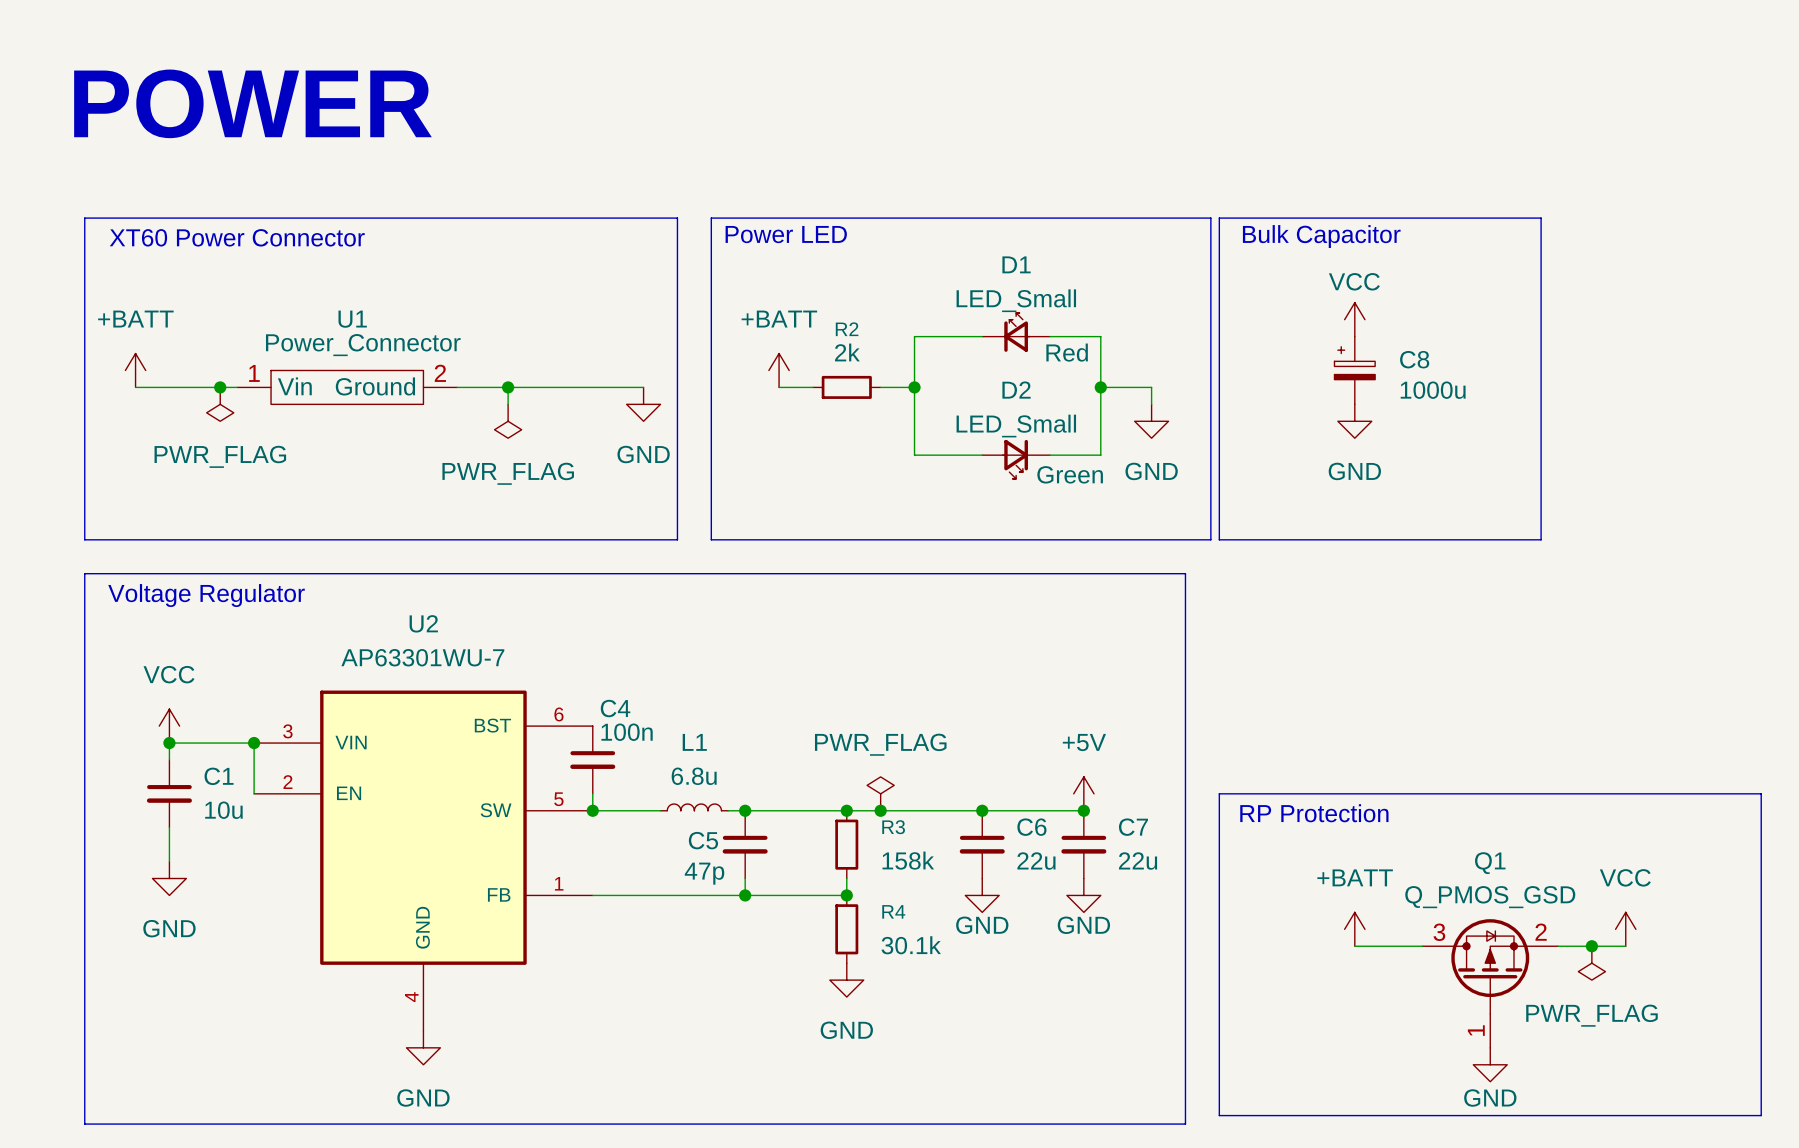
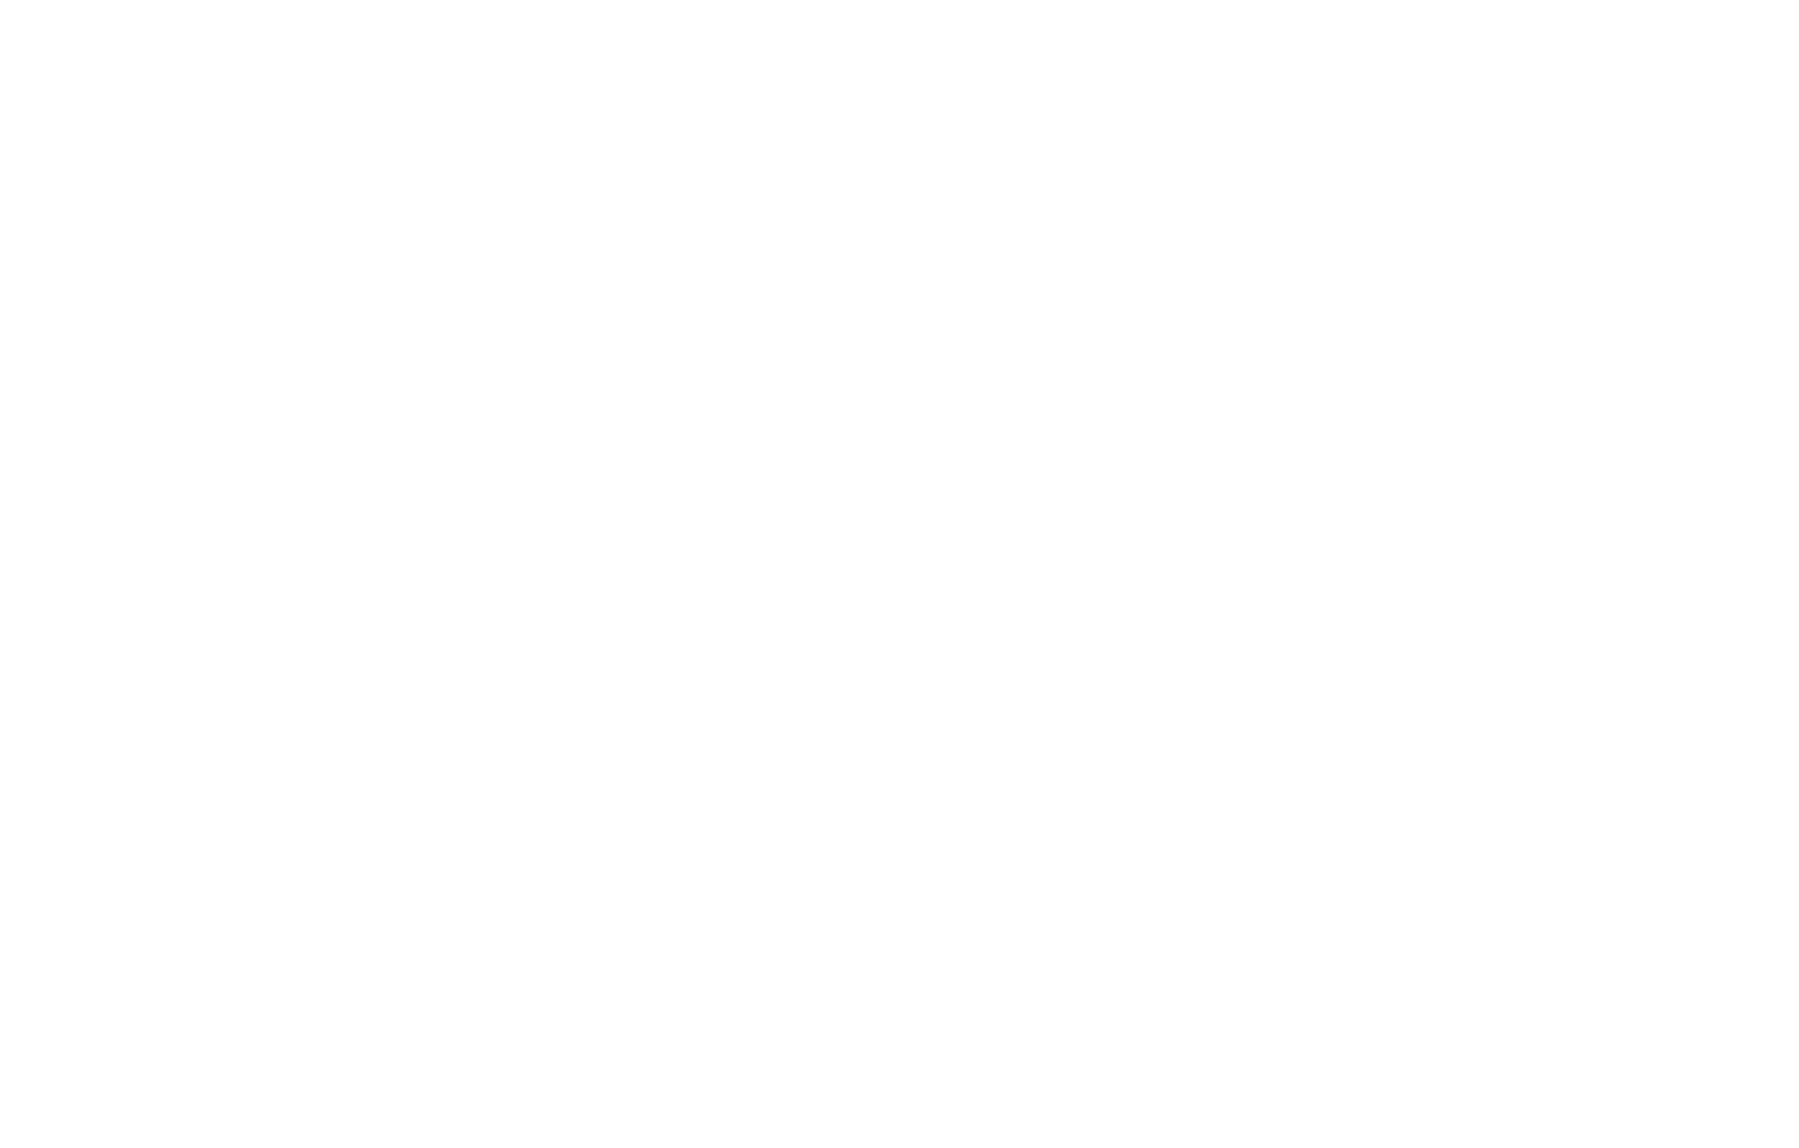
text: POWER (252, 103) -> none
line: (84, 218) (677, 218) (677, 539) (84, 539) (84, 218) -> none
line: (711, 218) (1210, 218) (1210, 539) (711, 539) (711, 218) -> none
line: (1219, 218) (1219, 539) (1541, 539) (1541, 218) (1219, 218) -> none
text: Power LED (786, 234) -> none
text: Bulk Capacitor (1321, 236) -> none
text: XT60 Power Connector (237, 237) -> none
power symbol: VCC (1354, 319) -> none
D1: LED_Small (1016, 332) -> none
wire: (982, 336) (914, 336) (914, 455) (982, 455) -> none
wire: (1049, 336) (1100, 336) (1100, 455) (1049, 455) -> none
power symbol: +BATT (135, 370) -> none
power symbol: +BATT (779, 370) -> none
C8: 1000u (1354, 370) -> none
wire: (135, 387) (237, 387) -> none
junction: (220, 387) -> none
U1: Power_Connector (347, 387) -> none
wire: (457, 387) (643, 387) -> none
wire: (508, 387) (508, 404) -> none
junction: (508, 387) -> none
wire: (779, 387) (812, 387) -> none
R2: 2k (846, 387) -> none
wire: (880, 387) (914, 387) -> none
junction: (914, 387) -> none
wire: (1100, 387) (1151, 387) (1151, 404) -> none
junction: (1100, 387) -> none
power symbol: PWR_FLAG (220, 404) -> none
power symbol: GND (643, 404) -> none
power symbol: PWR_FLAG (508, 421) -> none
power symbol: GND (1151, 421) -> none
power symbol: GND (1354, 421) -> none
D2: LED_Small (1016, 459) -> none
line: (84, 573) (84, 1124) (1185, 1124) (1185, 573) (84, 573) -> none
text: Voltage Regulator (206, 595) -> none
power symbol: VCC (169, 726) -> none
junction: (169, 743) -> none
junction: (254, 743) -> none
wire: (169, 759) (169, 743) (254, 743) (254, 793) -> none
C4: 100n (592, 759) -> none
C1: 10u (169, 793) -> none
wire: (592, 793) (592, 810) (660, 810) -> none
power symbol: PWR_FLAG (880, 793) -> none
power symbol: +5V (1083, 793) -> none
line: (1219, 793) (1761, 793) (1761, 1115) (1219, 1115) (1219, 793) -> none
L1: 6.8u (694, 807) -> none
junction: (592, 810) -> none
wire: (728, 810) (1083, 810) -> none
junction: (745, 810) -> none
junction: (846, 810) -> none
junction: (880, 810) -> none
junction: (982, 810) -> none
junction: (1083, 810) -> none
text: RP Protection (1314, 813) -> none
wire: (169, 827) (169, 861) -> none
C5: 47p (745, 844) -> none
R3: 158k (846, 844) -> none
C6: 22u (982, 844) -> none
C7: 22u (1083, 844) -> none
U2: AP63301WU-7 (423, 860) -> none
power symbol: GND (169, 878) -> none
wire: (745, 878) (745, 895) -> none
wire: (846, 878) (846, 895) (592, 895) -> none
junction: (745, 895) -> none
junction: (846, 895) -> none
power symbol: GND (982, 895) -> none
power symbol: GND (1083, 895) -> none
R4: 30.1k (846, 929) -> none
power symbol: +BATT (1354, 929) -> none
power symbol: VCC (1625, 929) -> none
wire: (1354, 946) (1422, 946) -> none
wire: (1558, 946) (1625, 946) -> none
junction: (1591, 946) -> none
power symbol: PWR_FLAG (1591, 963) -> none
power symbol: GND (846, 980) -> none
Q1: Q_PMOS_GSD (1490, 983) -> none
power symbol: GND (423, 1047) -> none
power symbol: GND (1490, 1064) -> none

